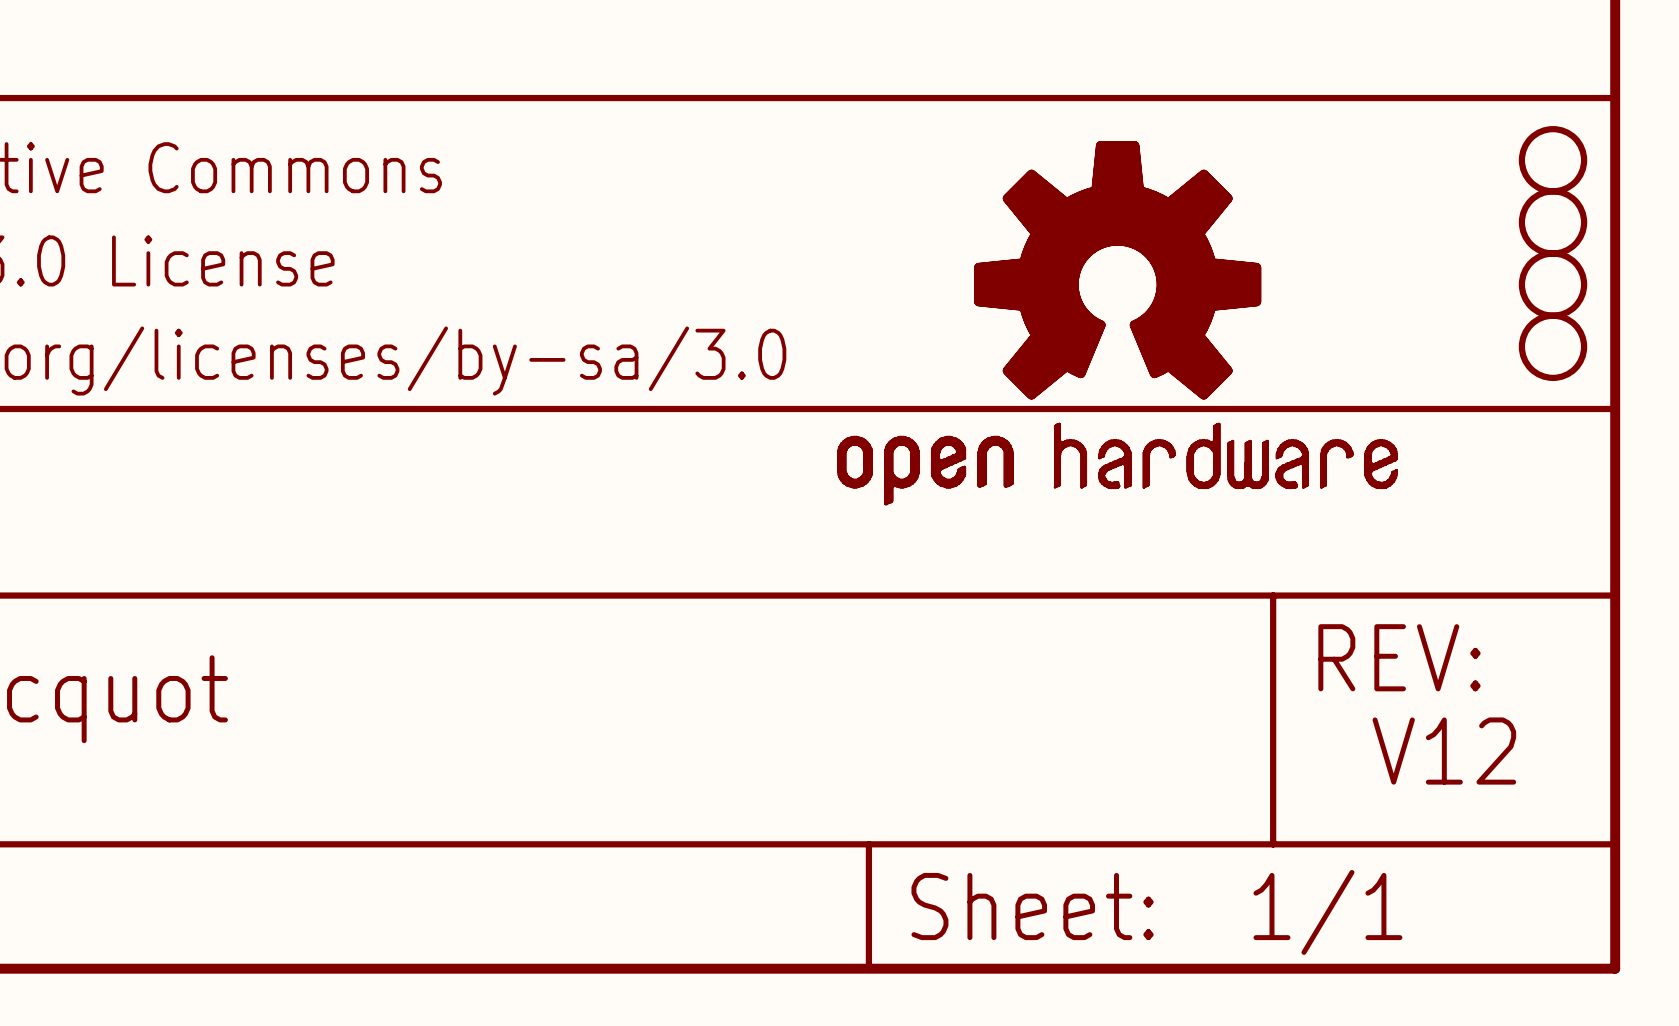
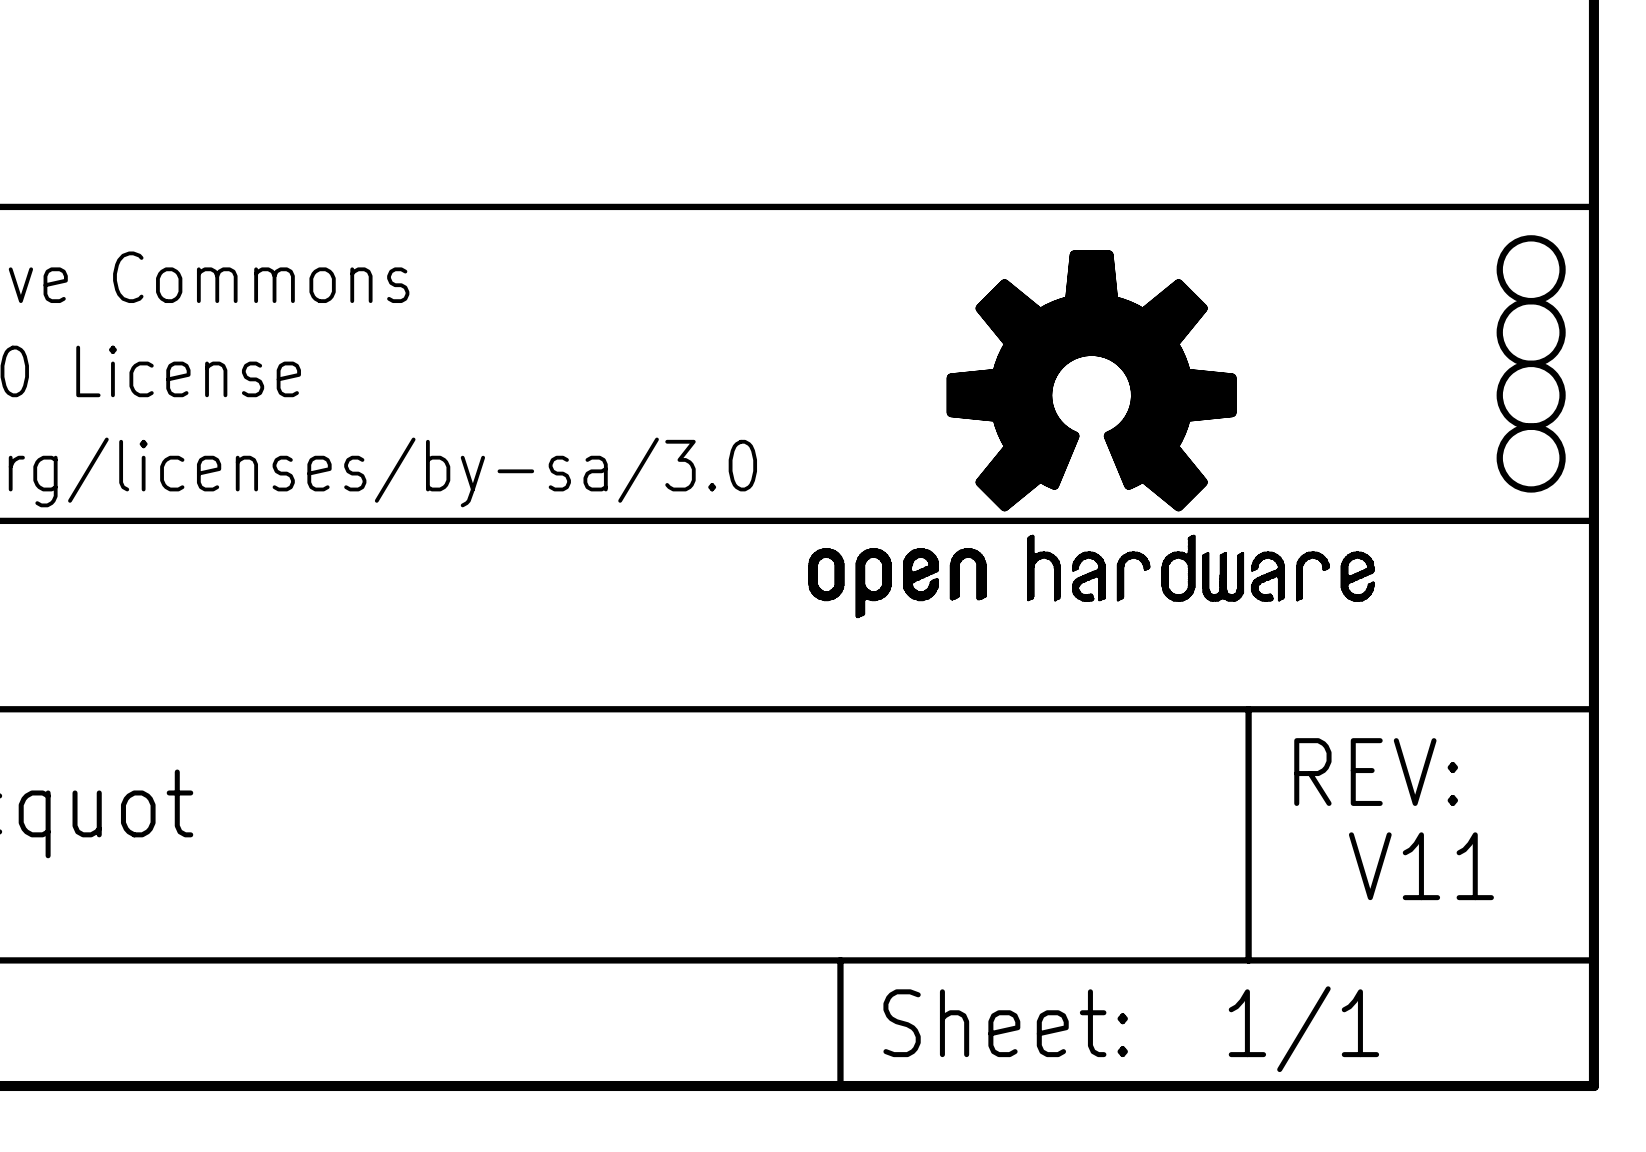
text: V12 (1444, 751) -> V11 (1421, 866)

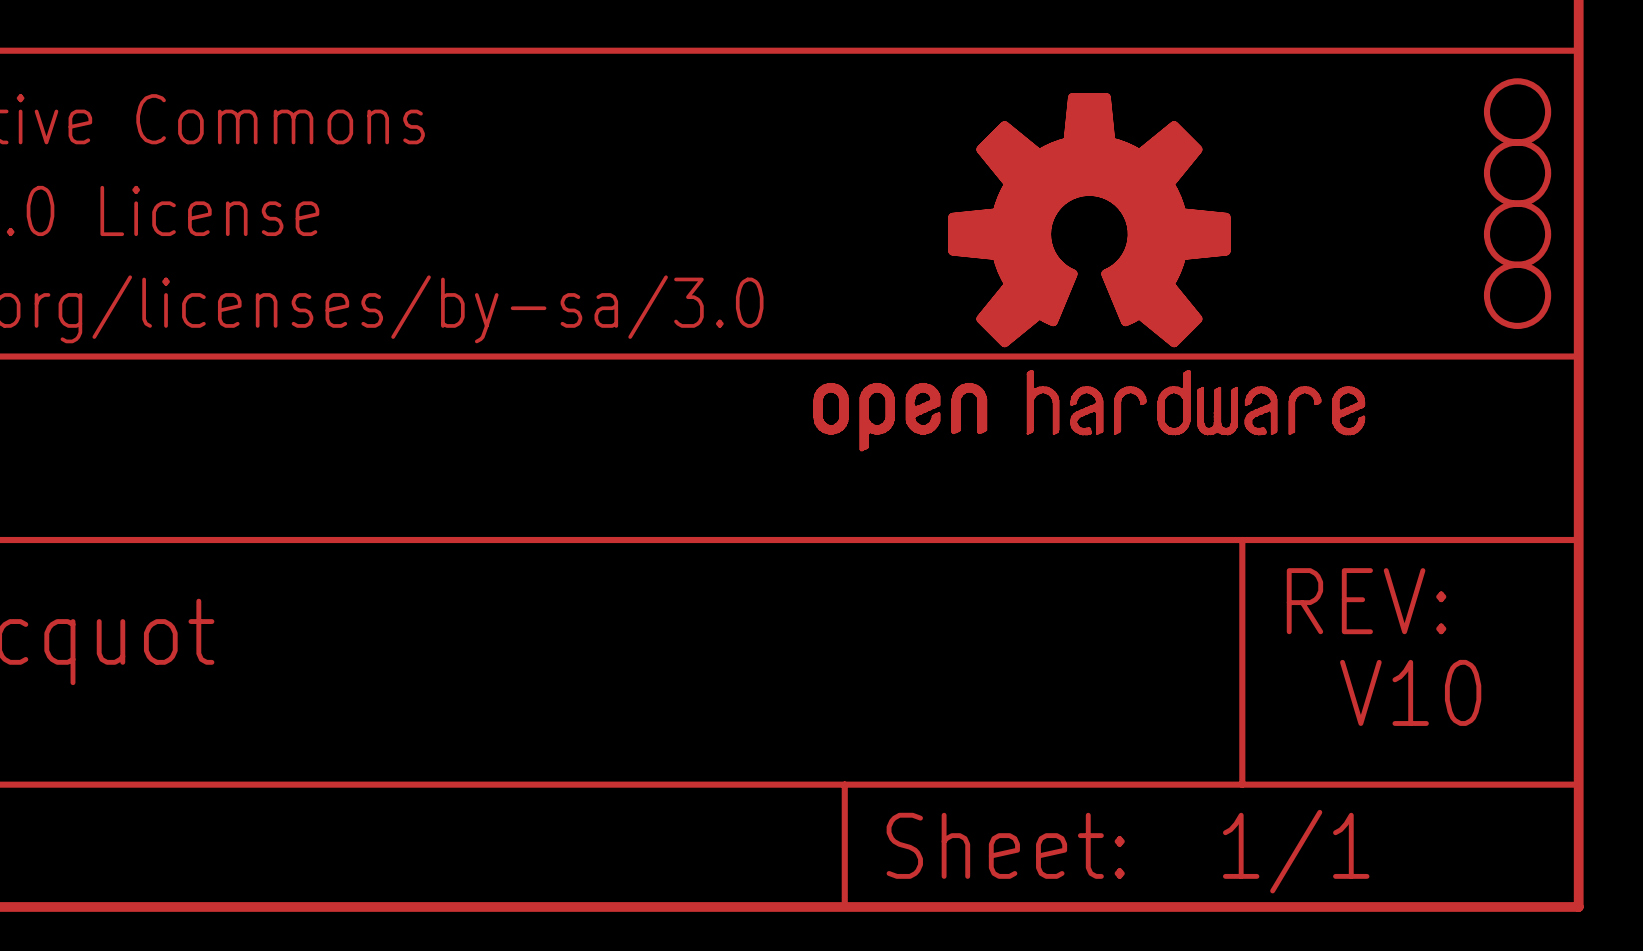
text: V11 (1421, 866) -> V10 (1410, 692)

